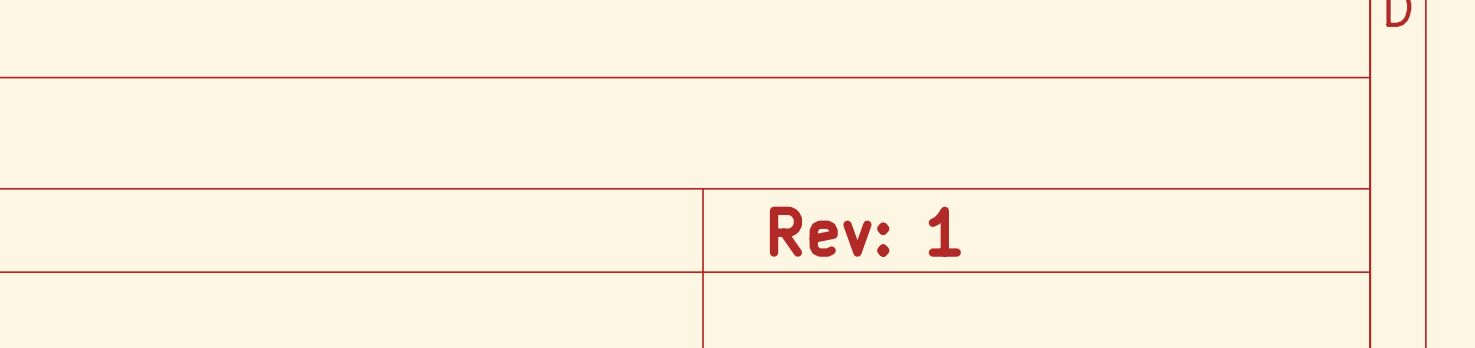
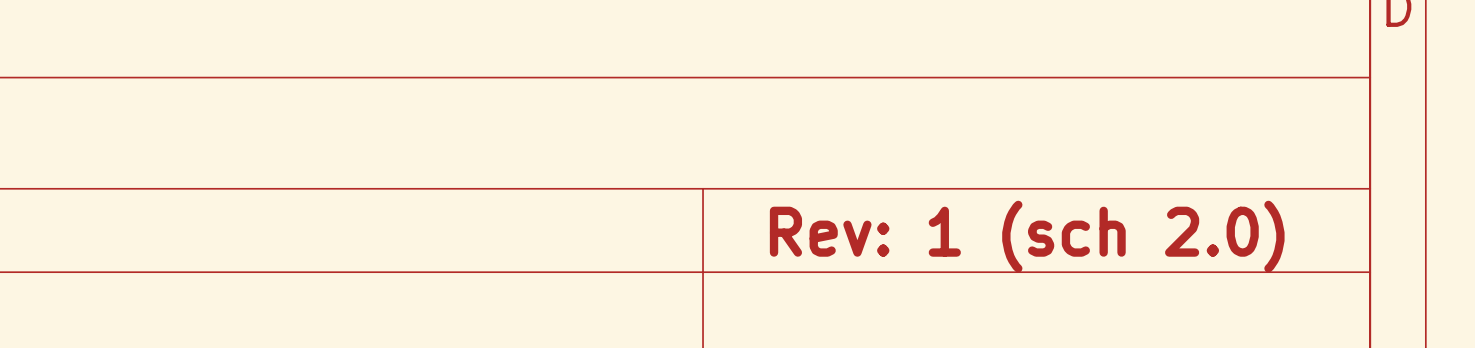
title block: Rev: 1 (865, 231) -> Rev: 1 (sch 2.0) (1027, 236)

